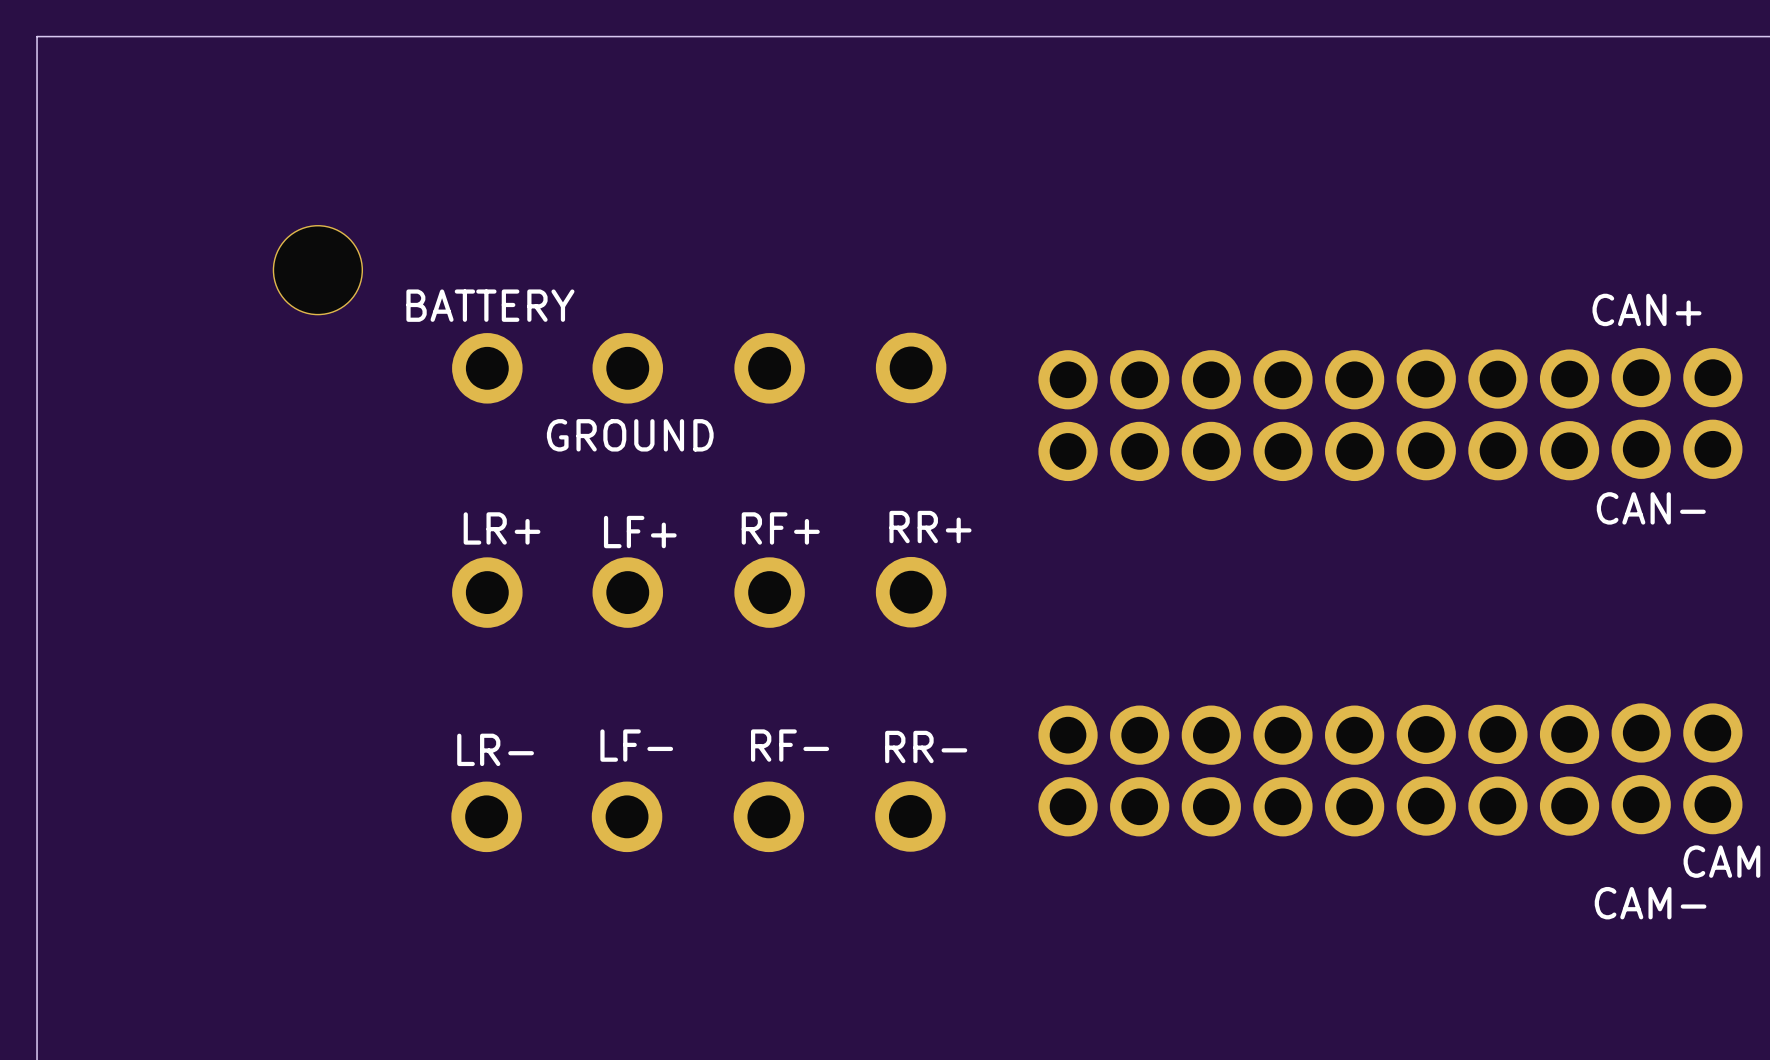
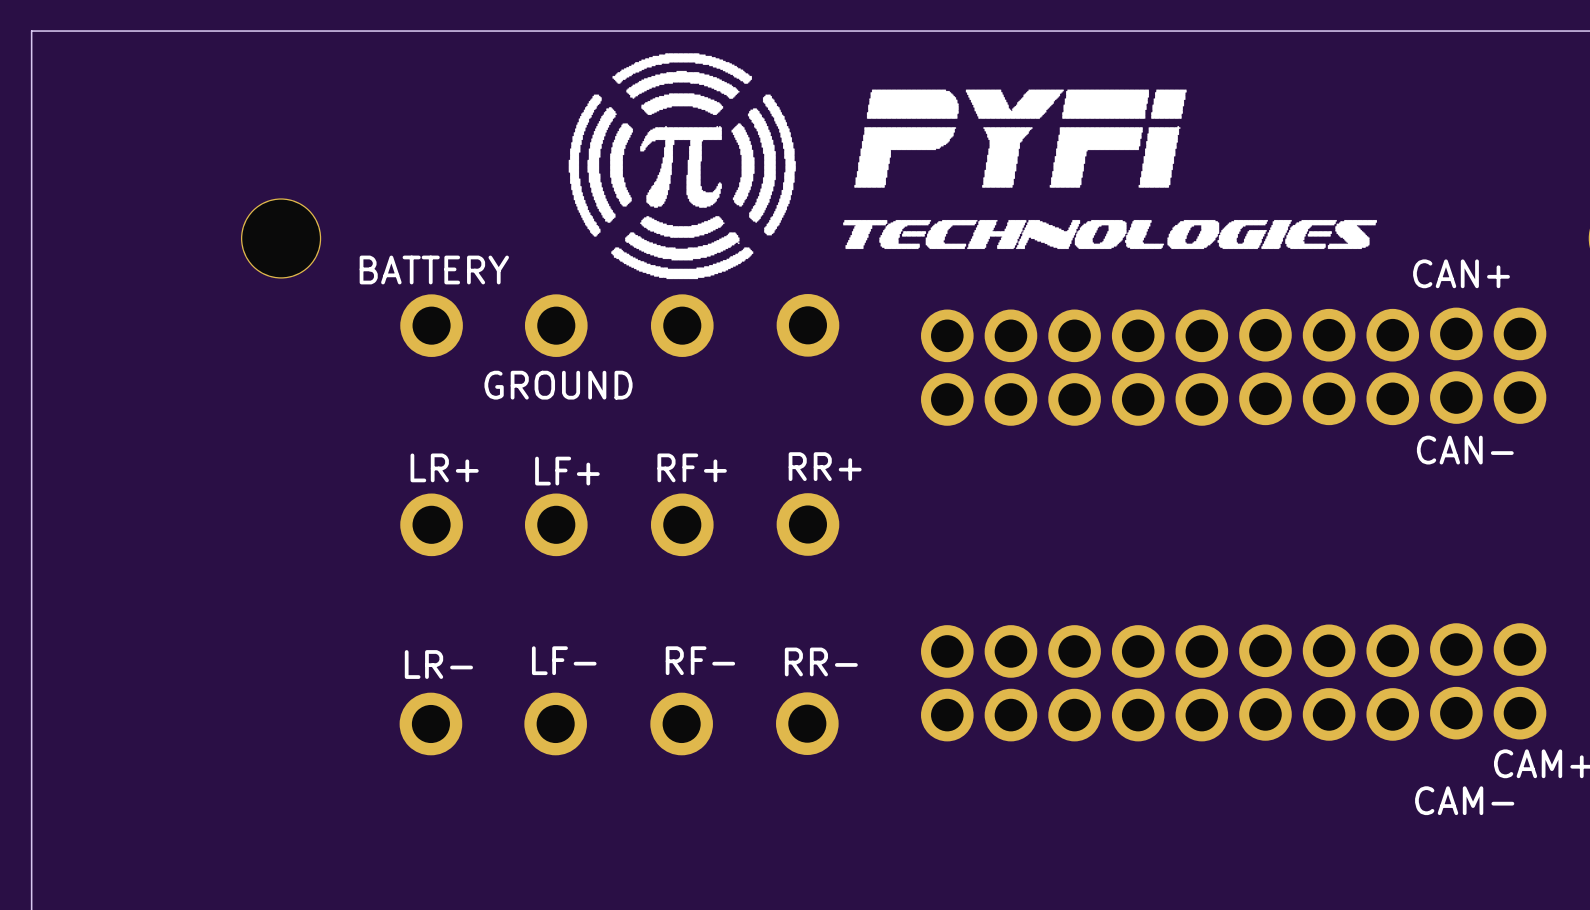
drawing: none -> [568, 53, 1377, 280]

